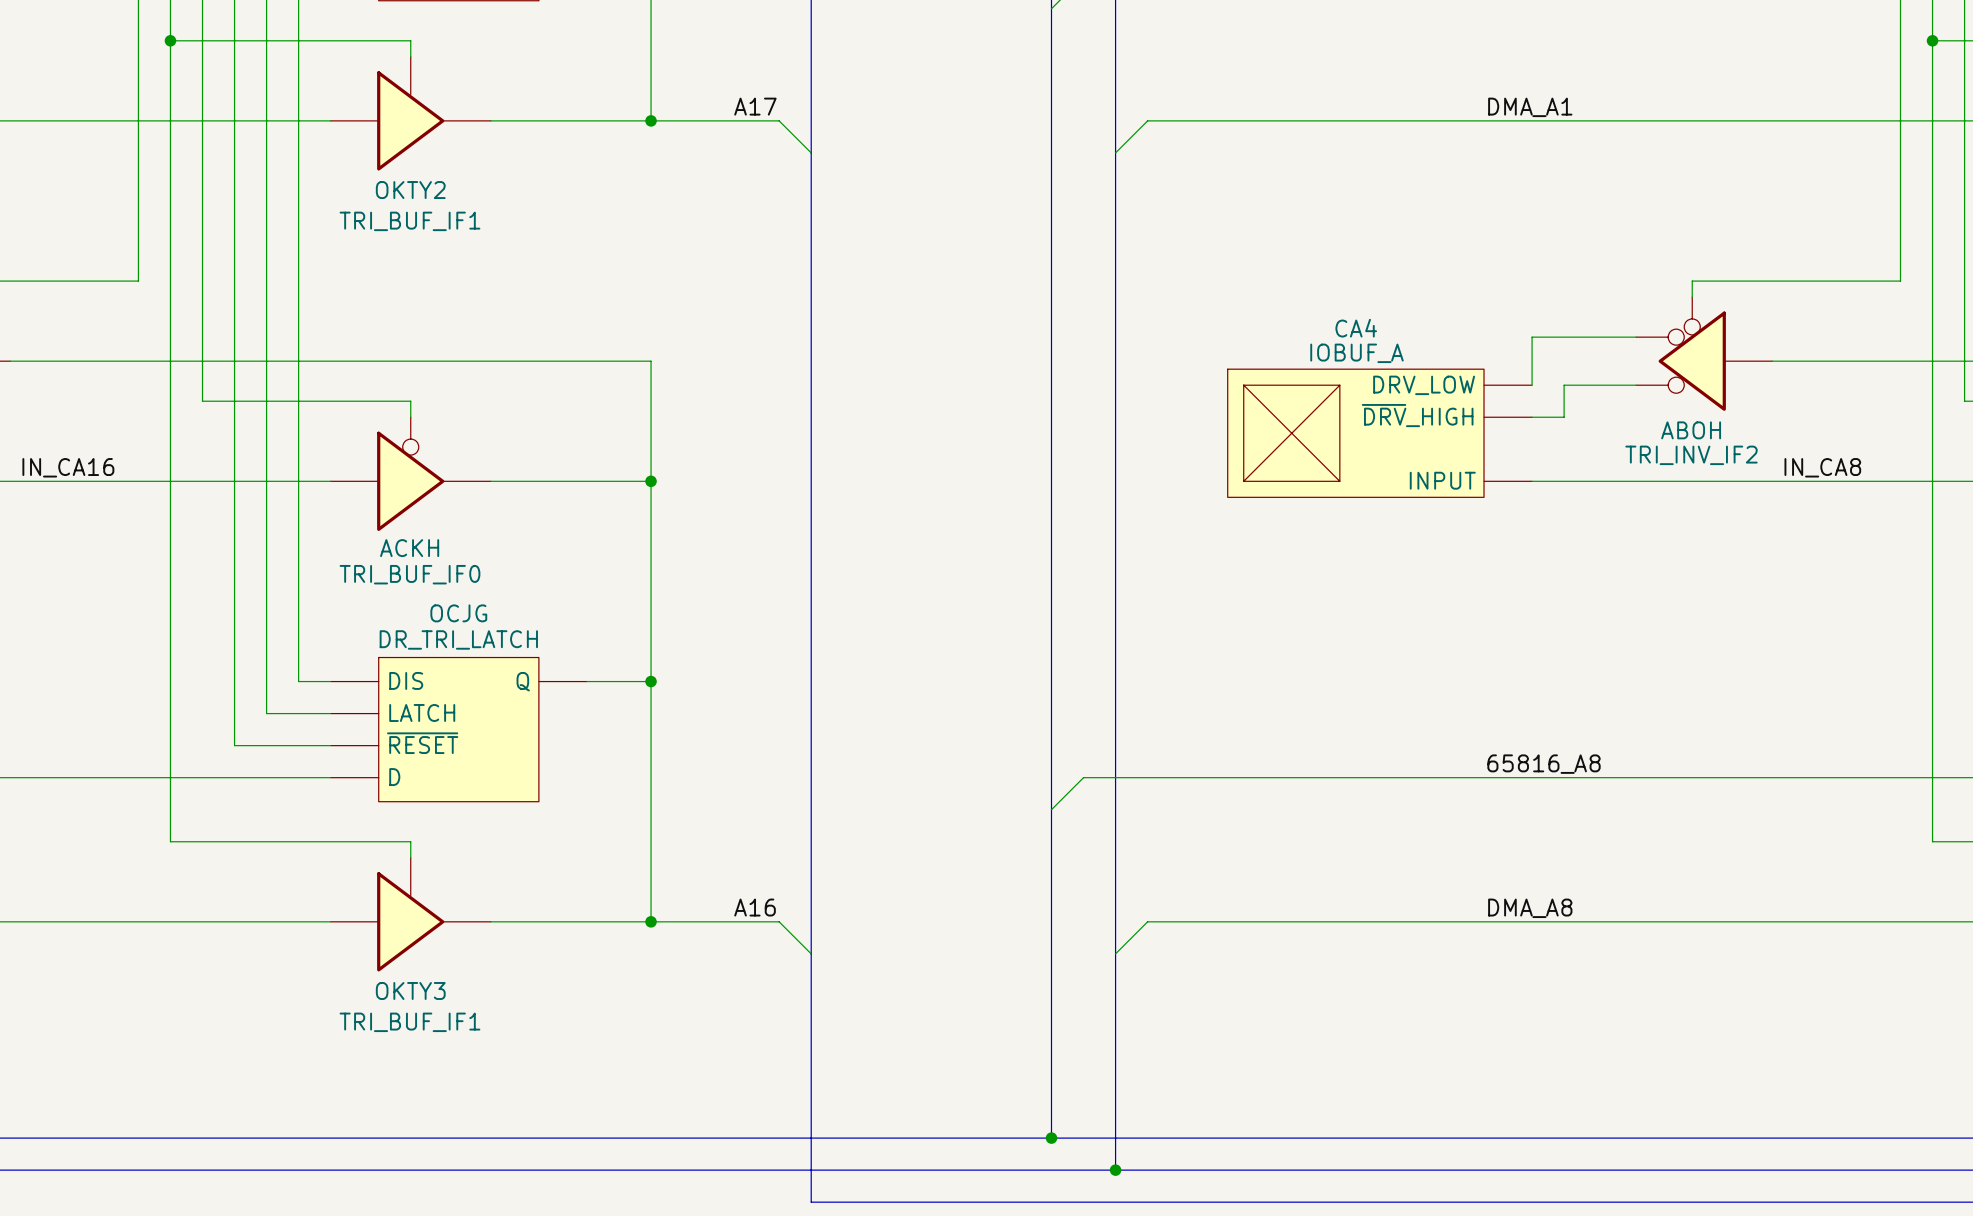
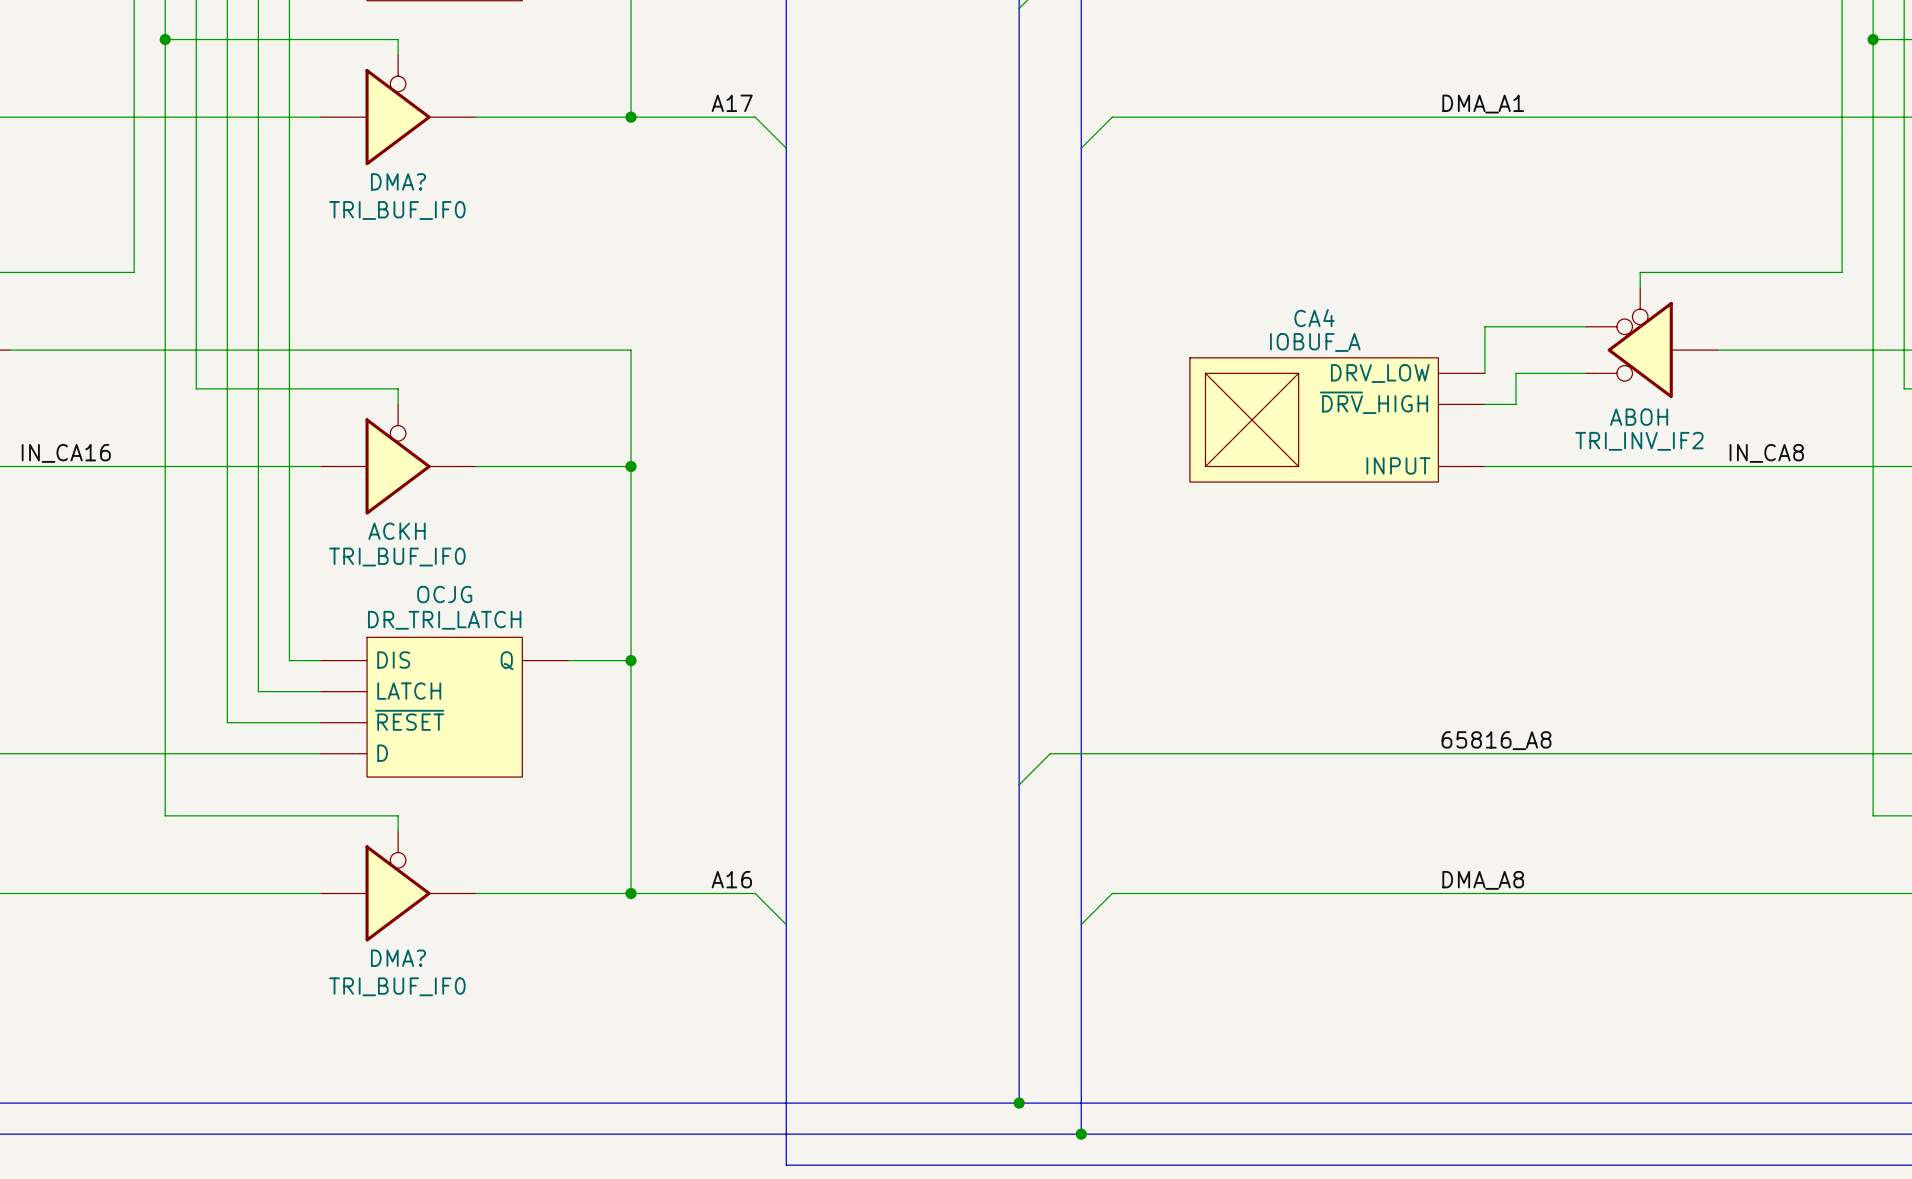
OKTY2: TRI_BUF_IF1 (410, 113) -> none
DMA?: none -> TRI_BUF_IF0 (398, 110)
OKTY3: TRI_BUF_IF1 (410, 914) -> none
DMA?: none -> TRI_BUF_IF0 (398, 886)

